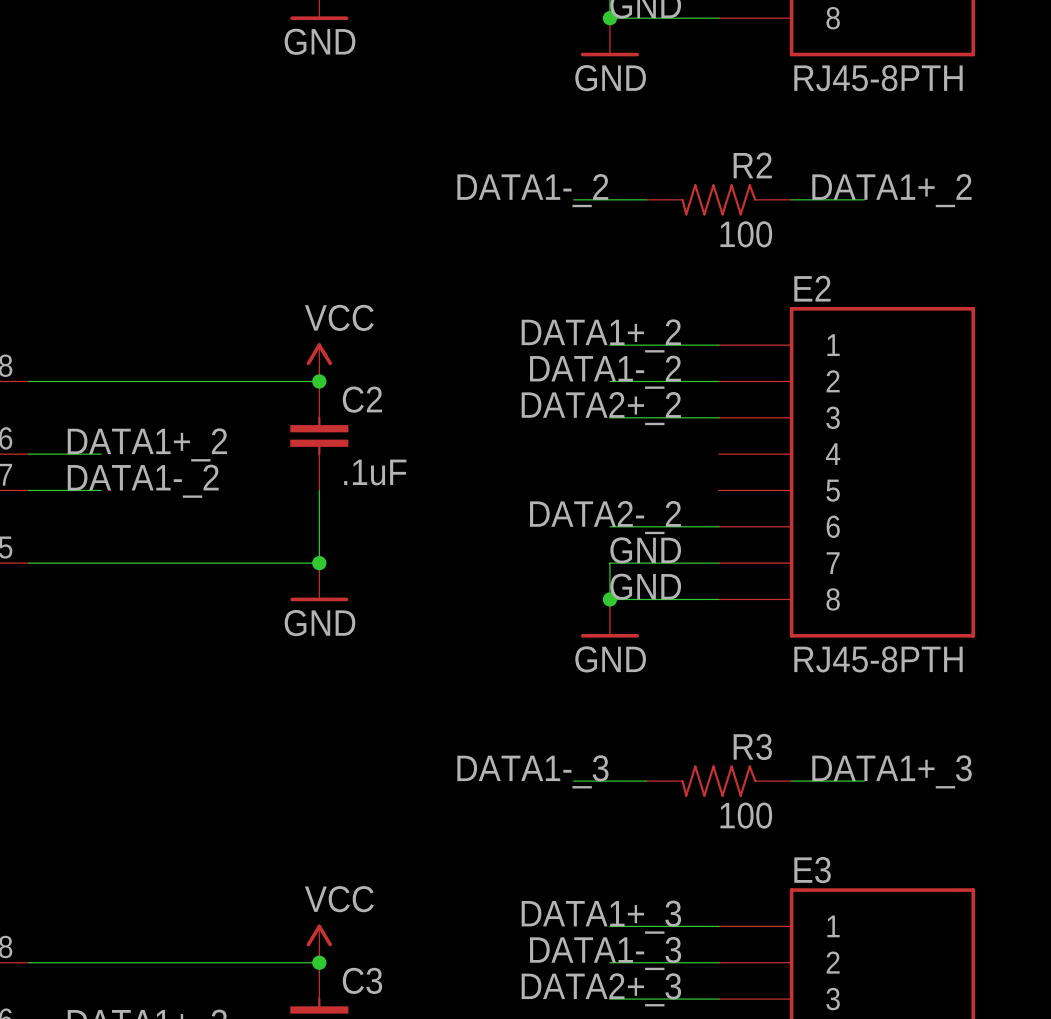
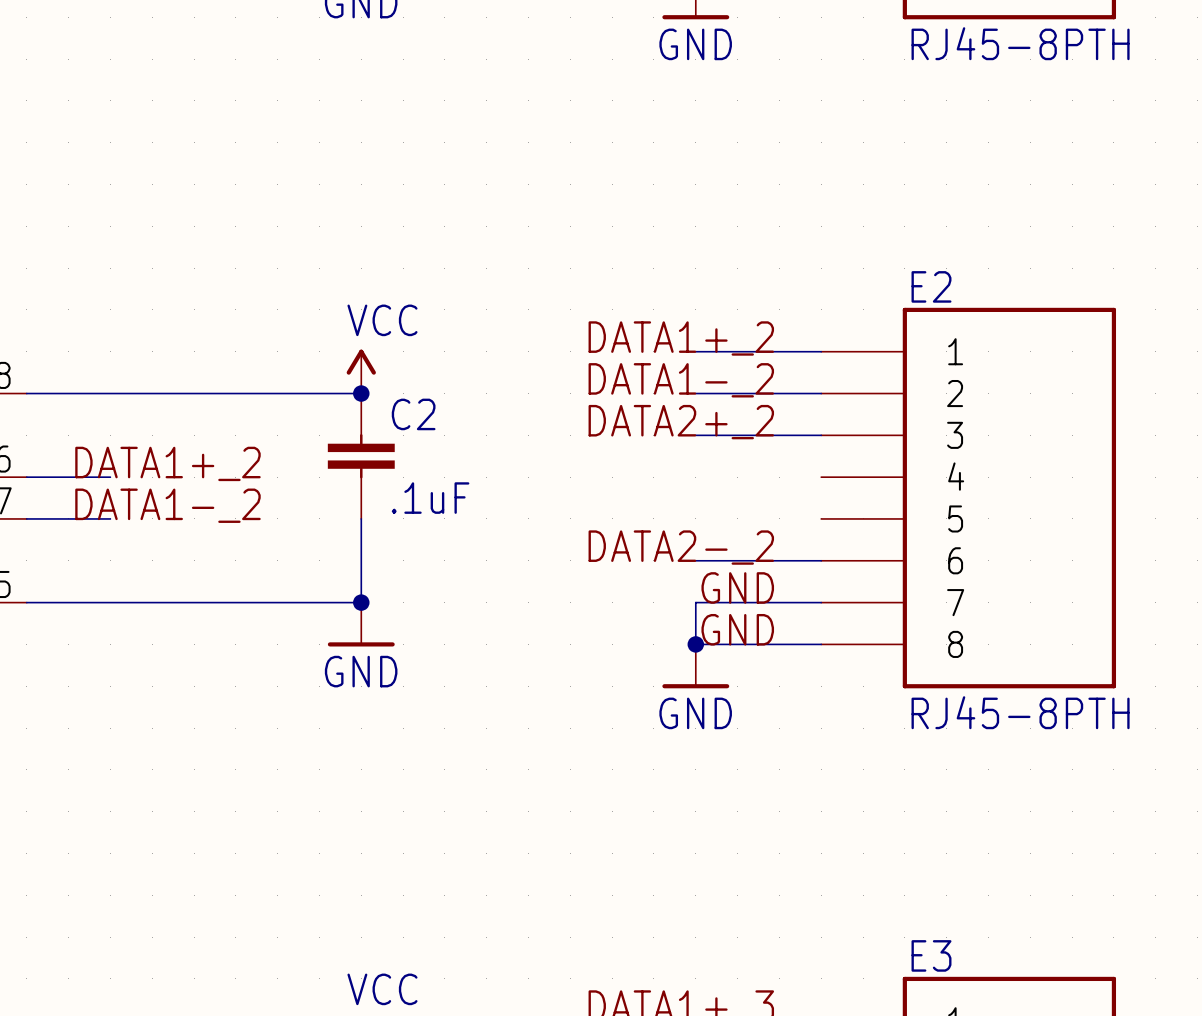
label: DATA1-_2 (532, 190) -> none
label: DATA1+_2 (891, 190) -> none
wire: (573, 199) (646, 199) -> none
R2: 100 (718, 199) -> none
wire: (791, 199) (864, 199) -> none
label: DATA1-_3 (532, 771) -> none
label: DATA1+_3 (892, 771) -> none
wire: (573, 781) (646, 781) -> none
R3: 100 (718, 781) -> none
wire: (791, 781) (864, 781) -> none

